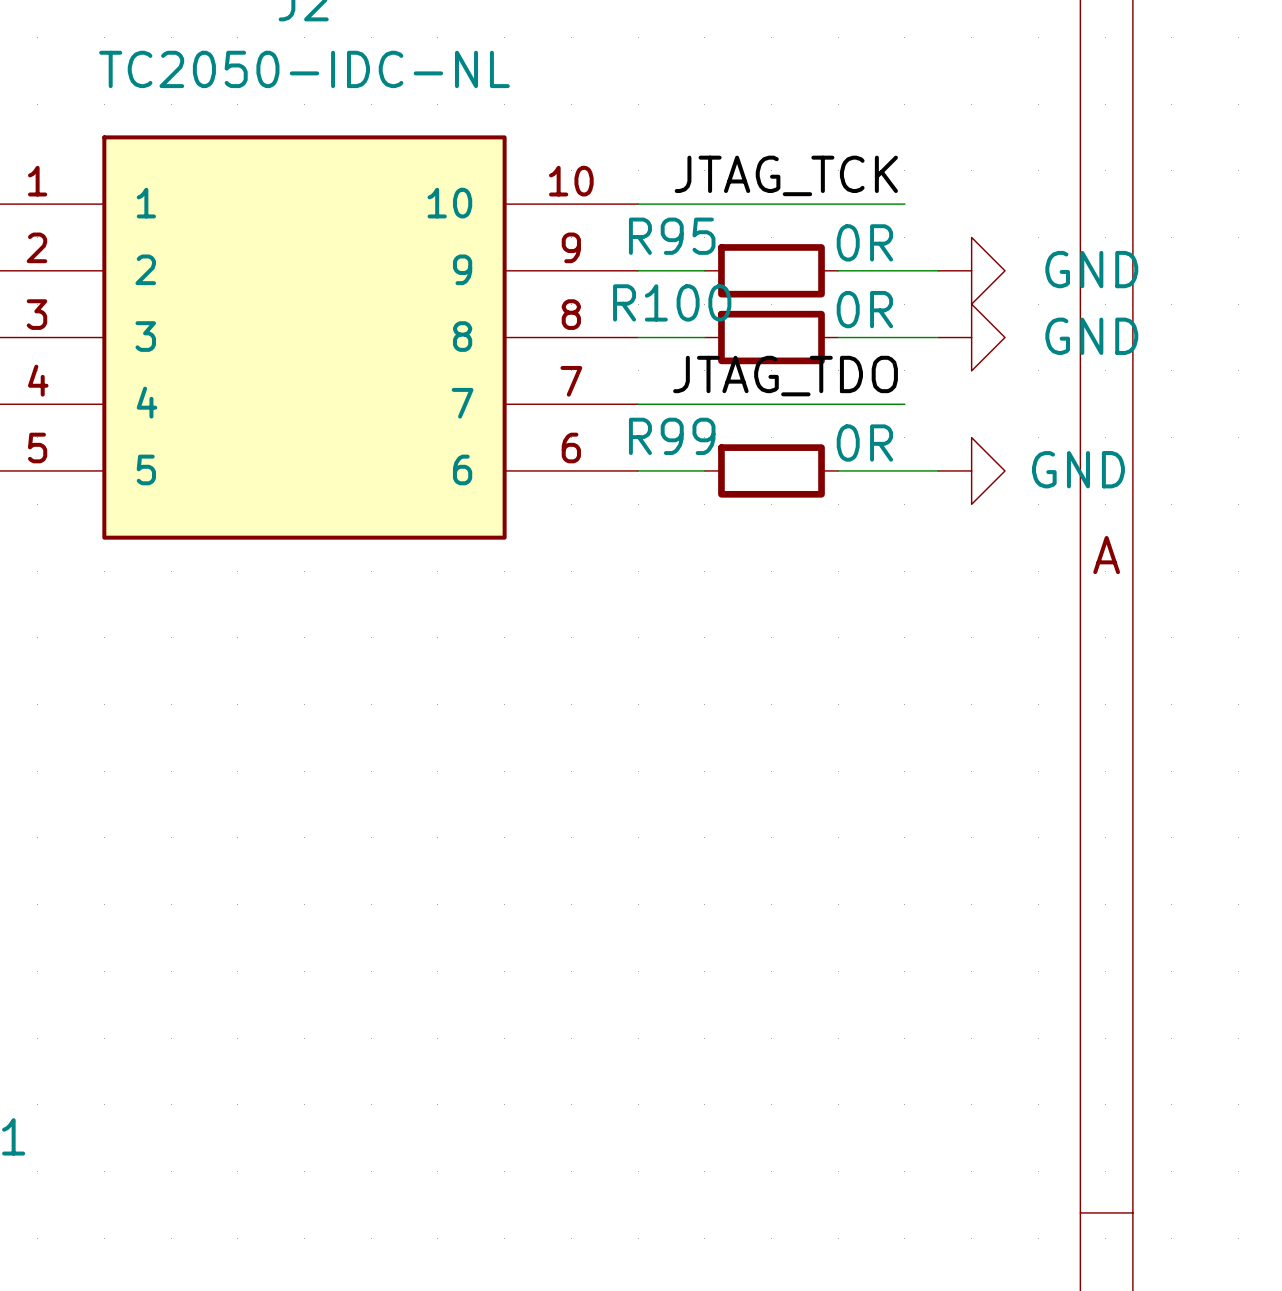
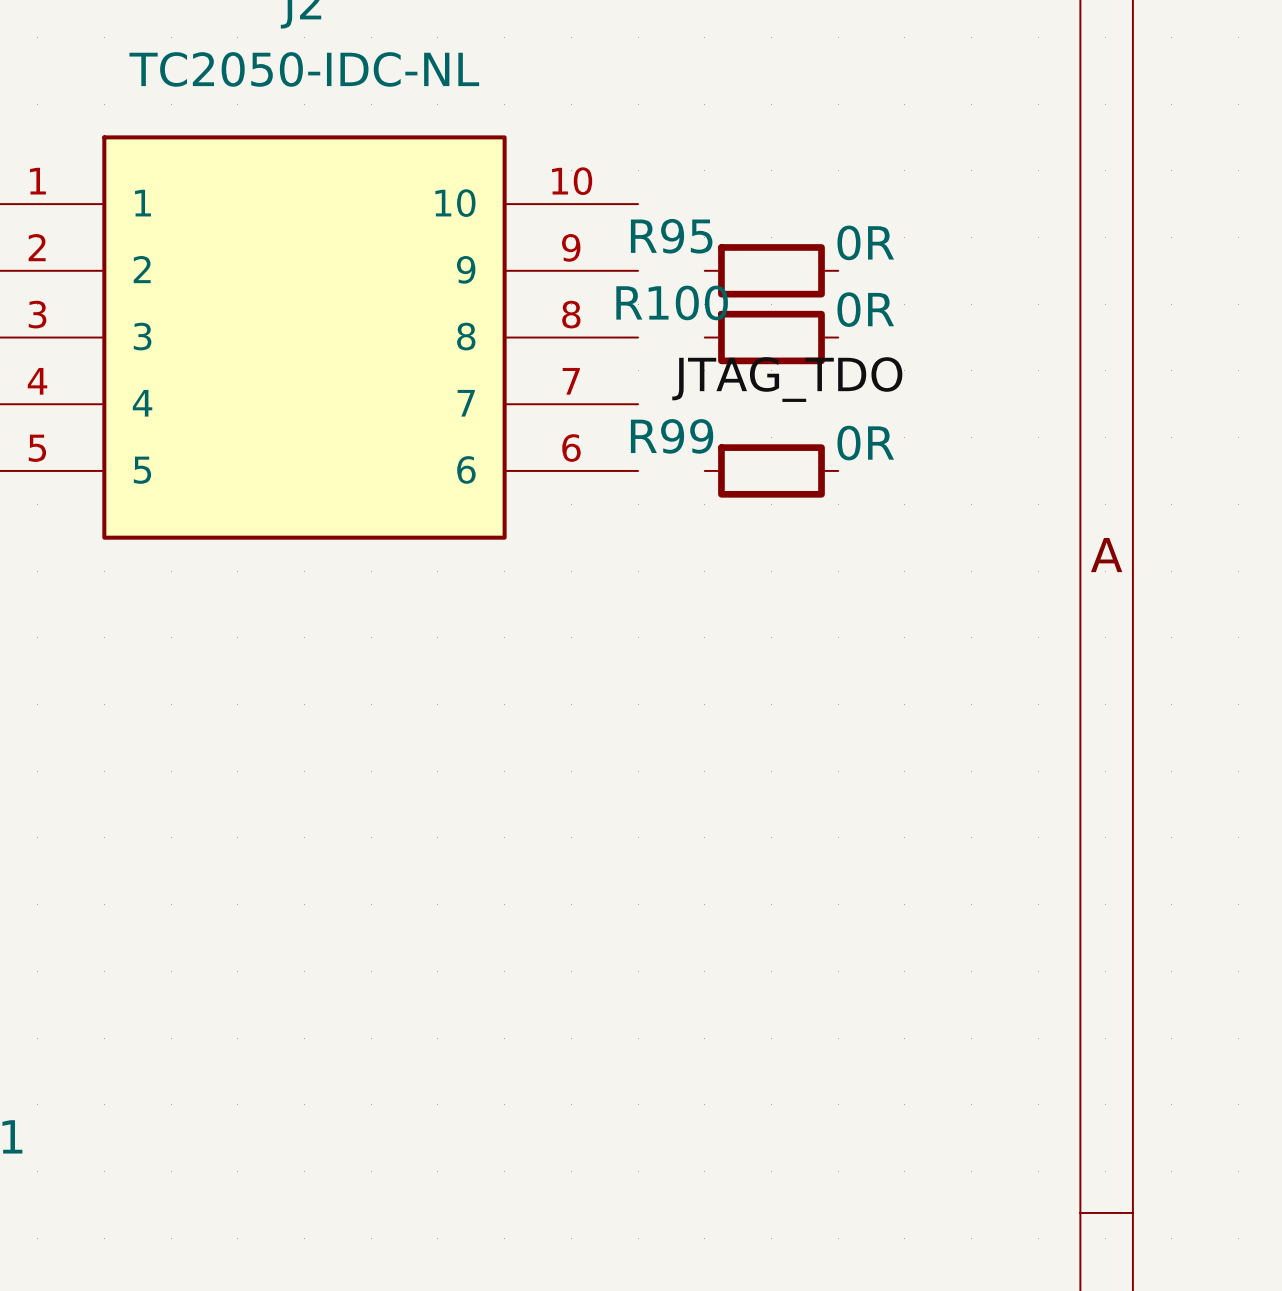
label: JTAG_TCK (786, 175) -> none
wire: (638, 204) (904, 204) -> none
wire: (638, 270) (704, 270) -> none
wire: (838, 270) (938, 270) -> none
power symbol: GND (971, 270) -> none
wire: (638, 337) (704, 337) -> none
wire: (838, 337) (938, 337) -> none
power symbol: GND (971, 337) -> none
wire: (638, 404) (904, 404) -> none
wire: (638, 470) (704, 470) -> none
wire: (838, 470) (938, 470) -> none
power symbol: GND (971, 470) -> none

